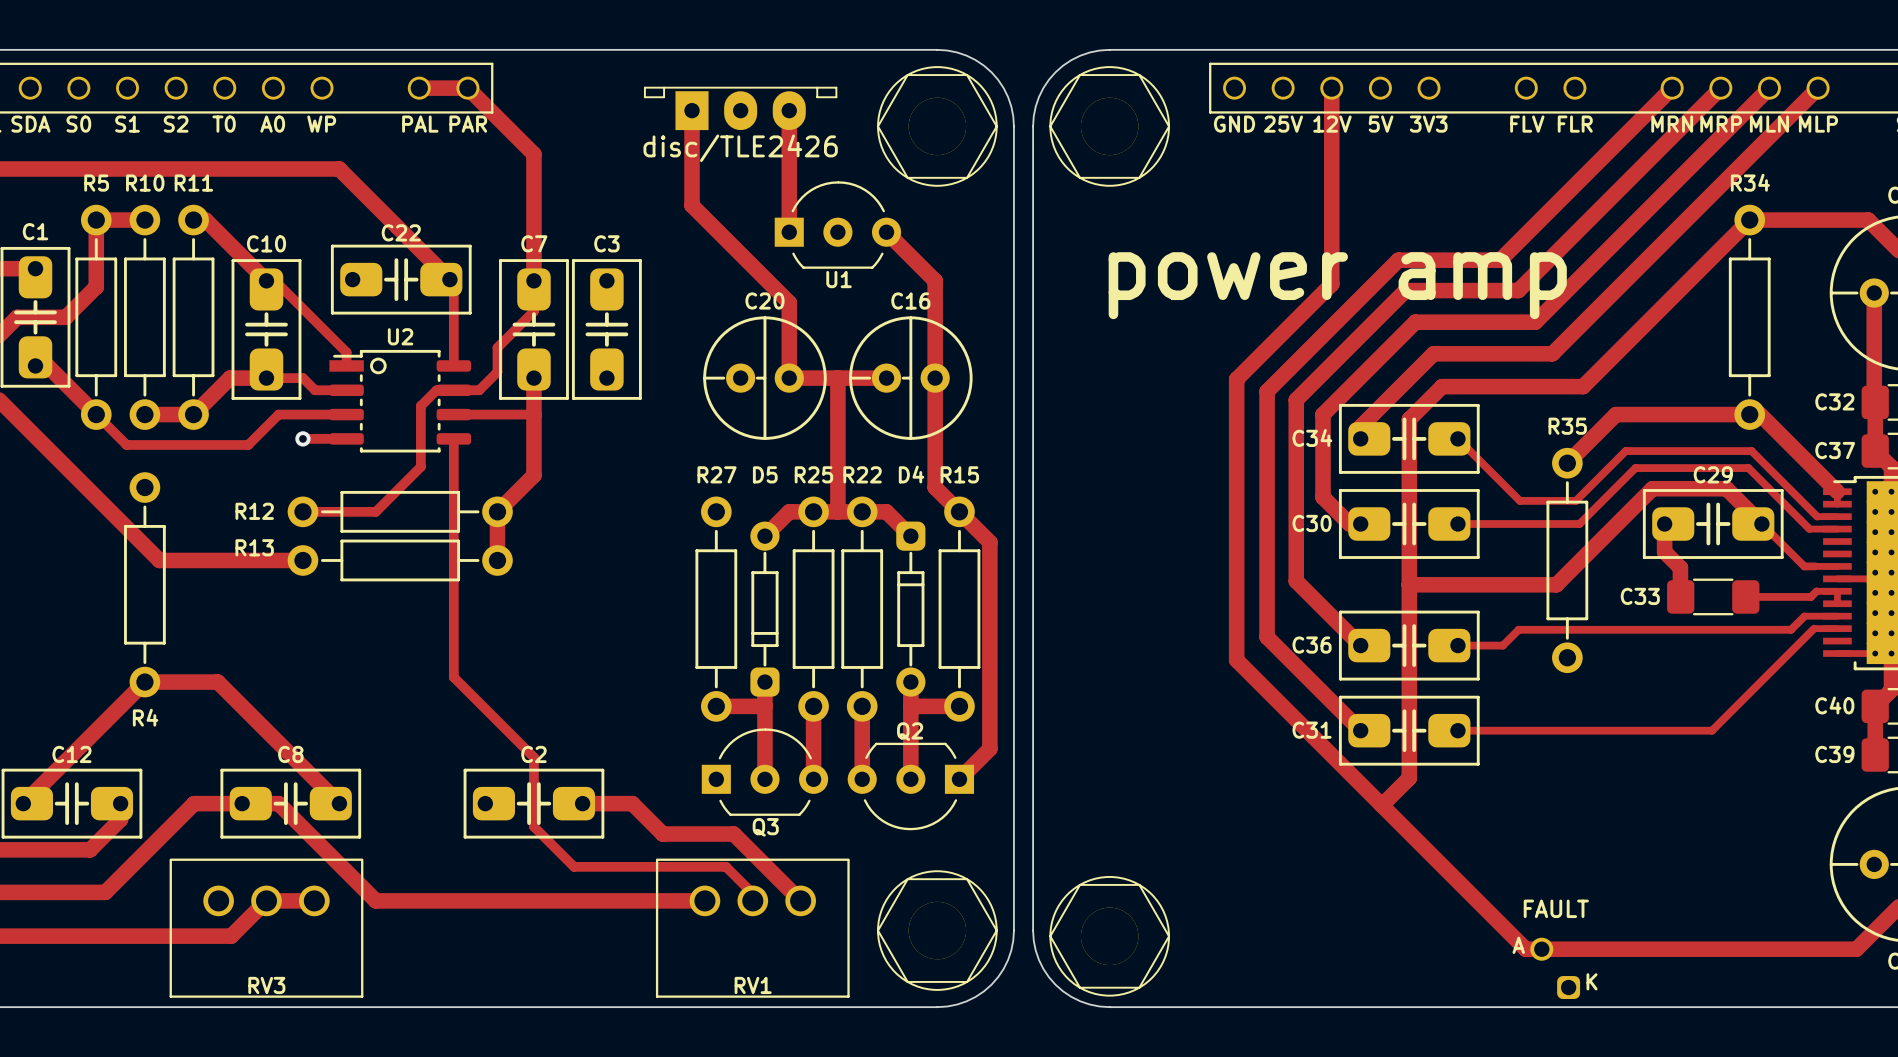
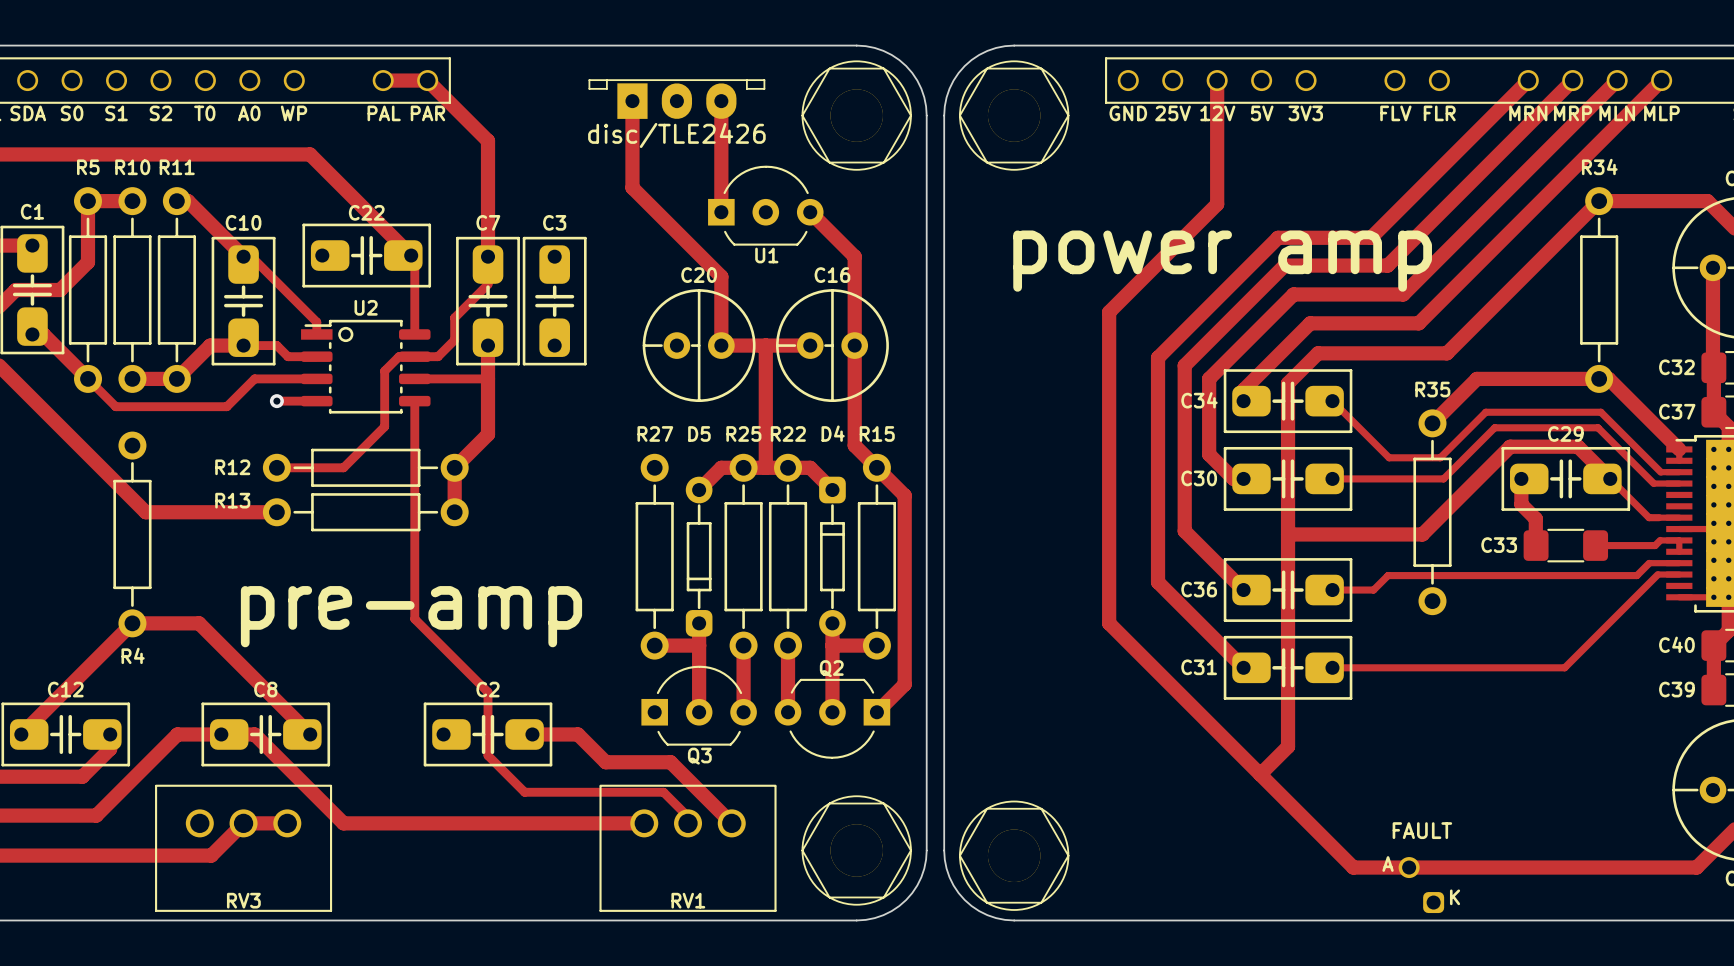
track: (1331, 223) (1331, 284) (1236, 379) (1236, 660) (1525, 949) -> (1217, 204) (1109, 312) (1109, 623) (1353, 867) (1394, 867)
text: none -> pre-amp (411, 616)
track: (1409, 778) (1381, 805) -> (1288, 711) (1288, 746) (1260, 774)

